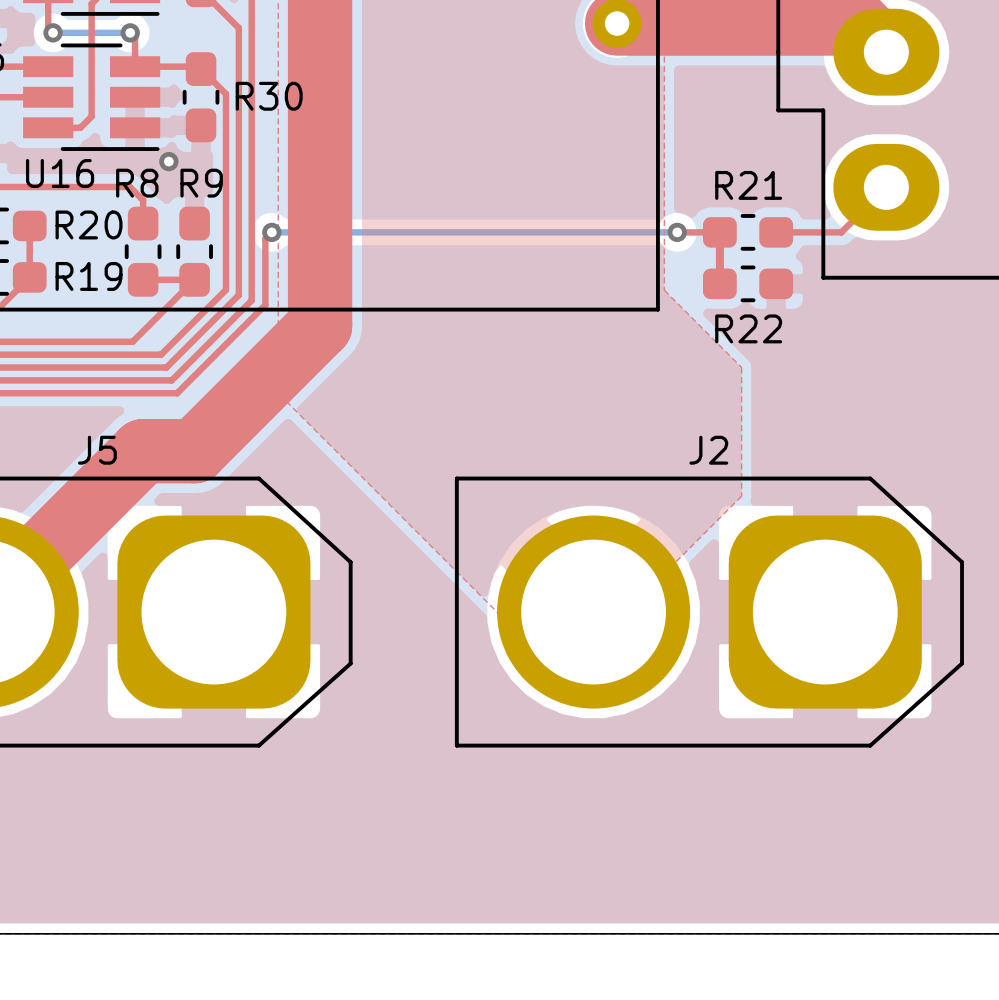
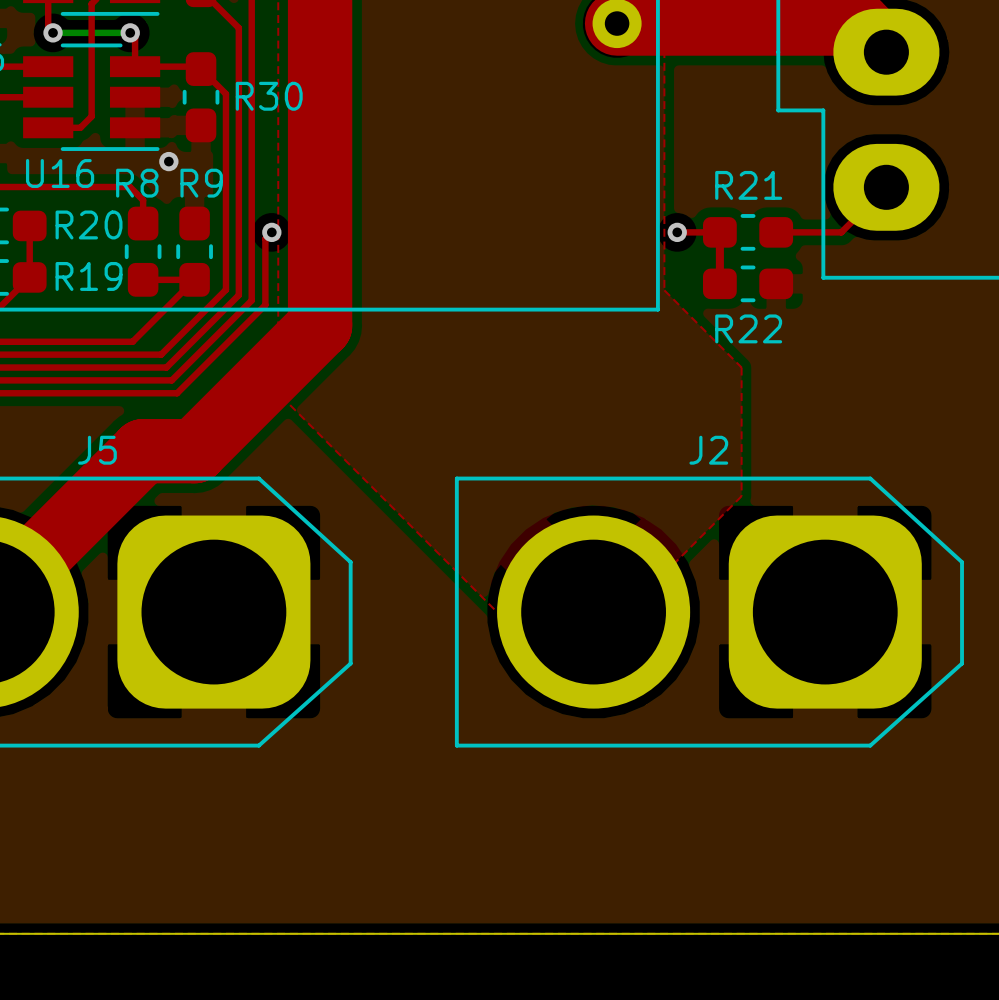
bottom track: (271, 232) (677, 232) -> none

